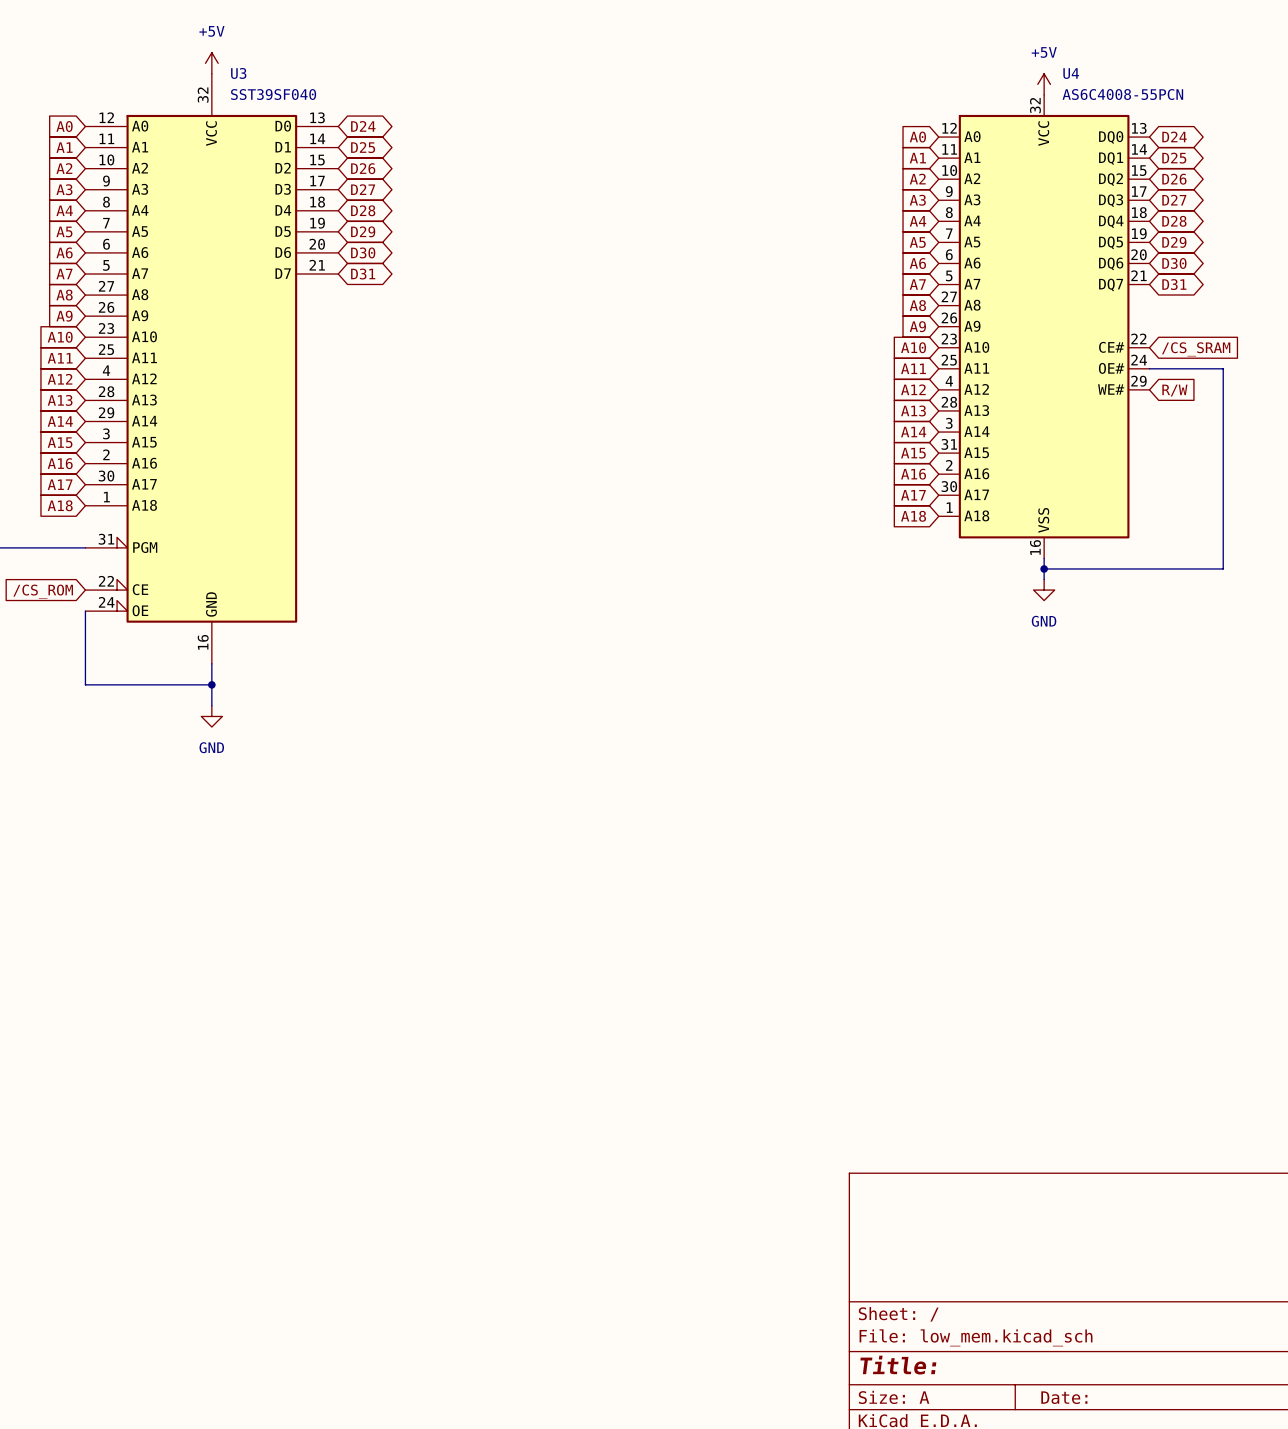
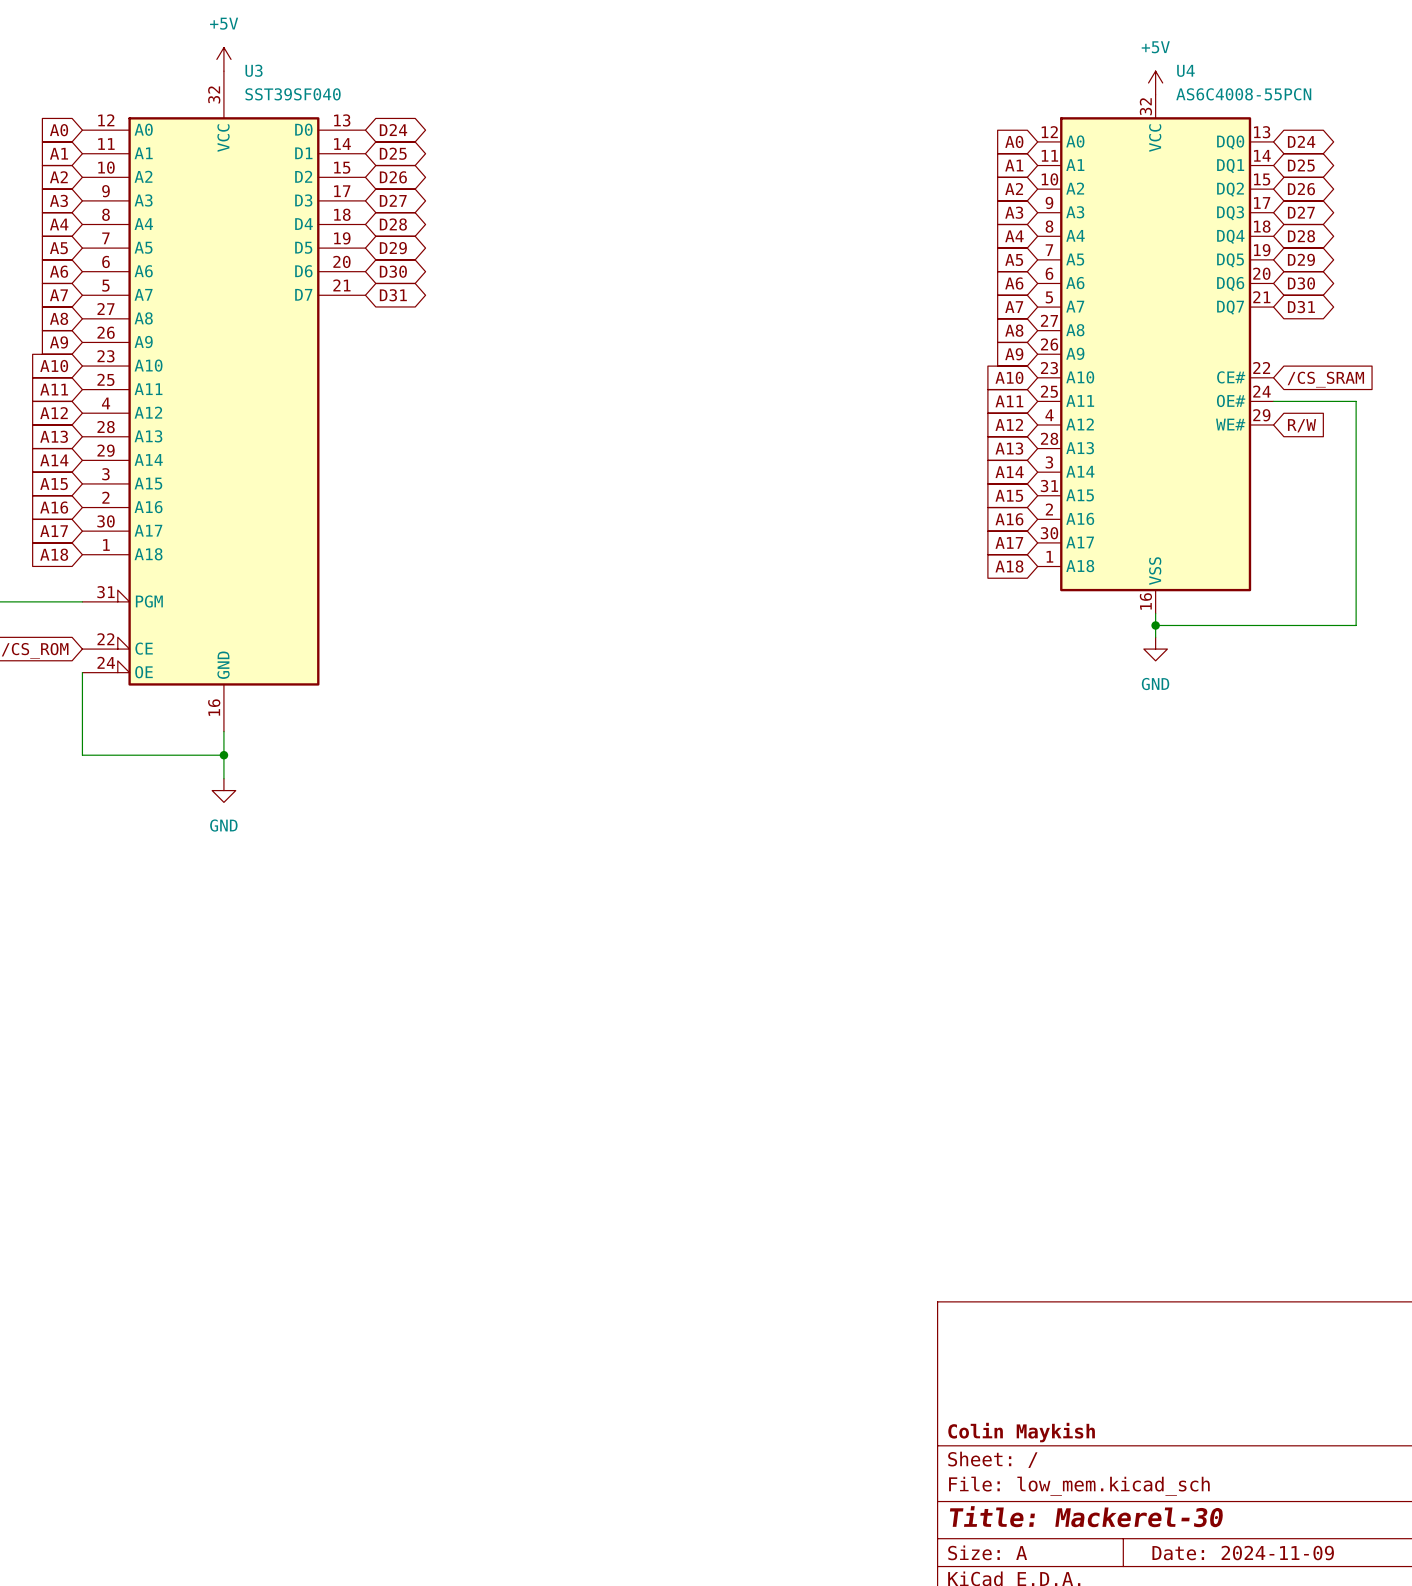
title block: none -> Colin Maykish (1021, 1432)
title block: Title: (898, 1365) -> Title: Mackerel-30 (1086, 1516)
title block: Date: (1064, 1397) -> Date: 2024-11-09 (1243, 1553)

